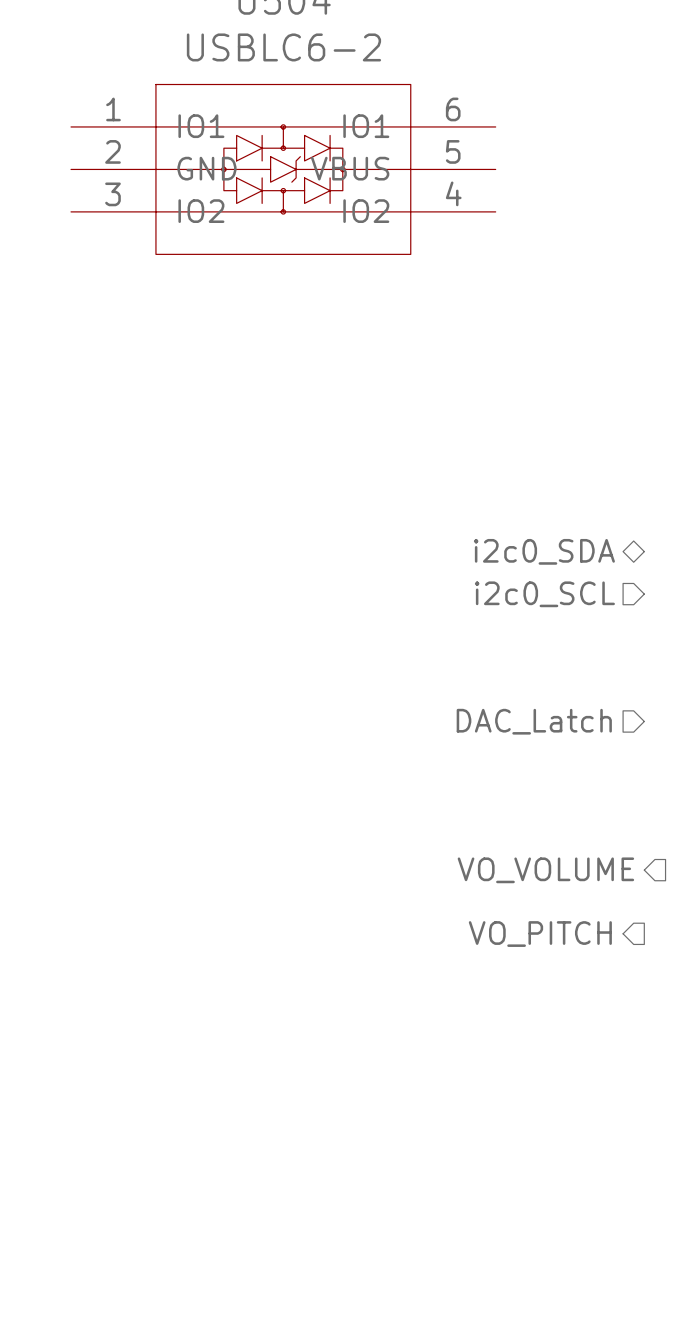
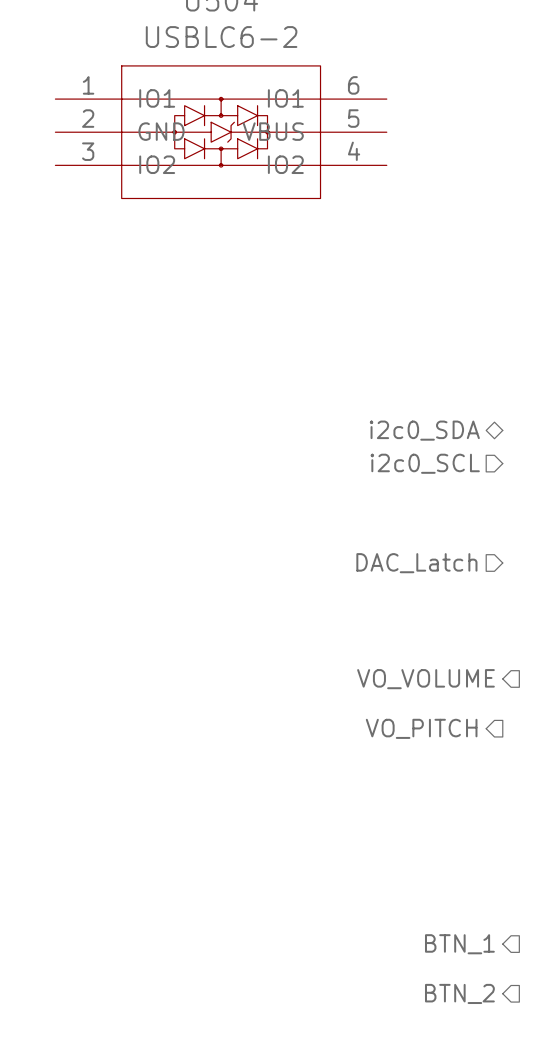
hierarchical label: none -> BTN_1 (459, 944)
hierarchical label: none -> BTN_2 (459, 993)

